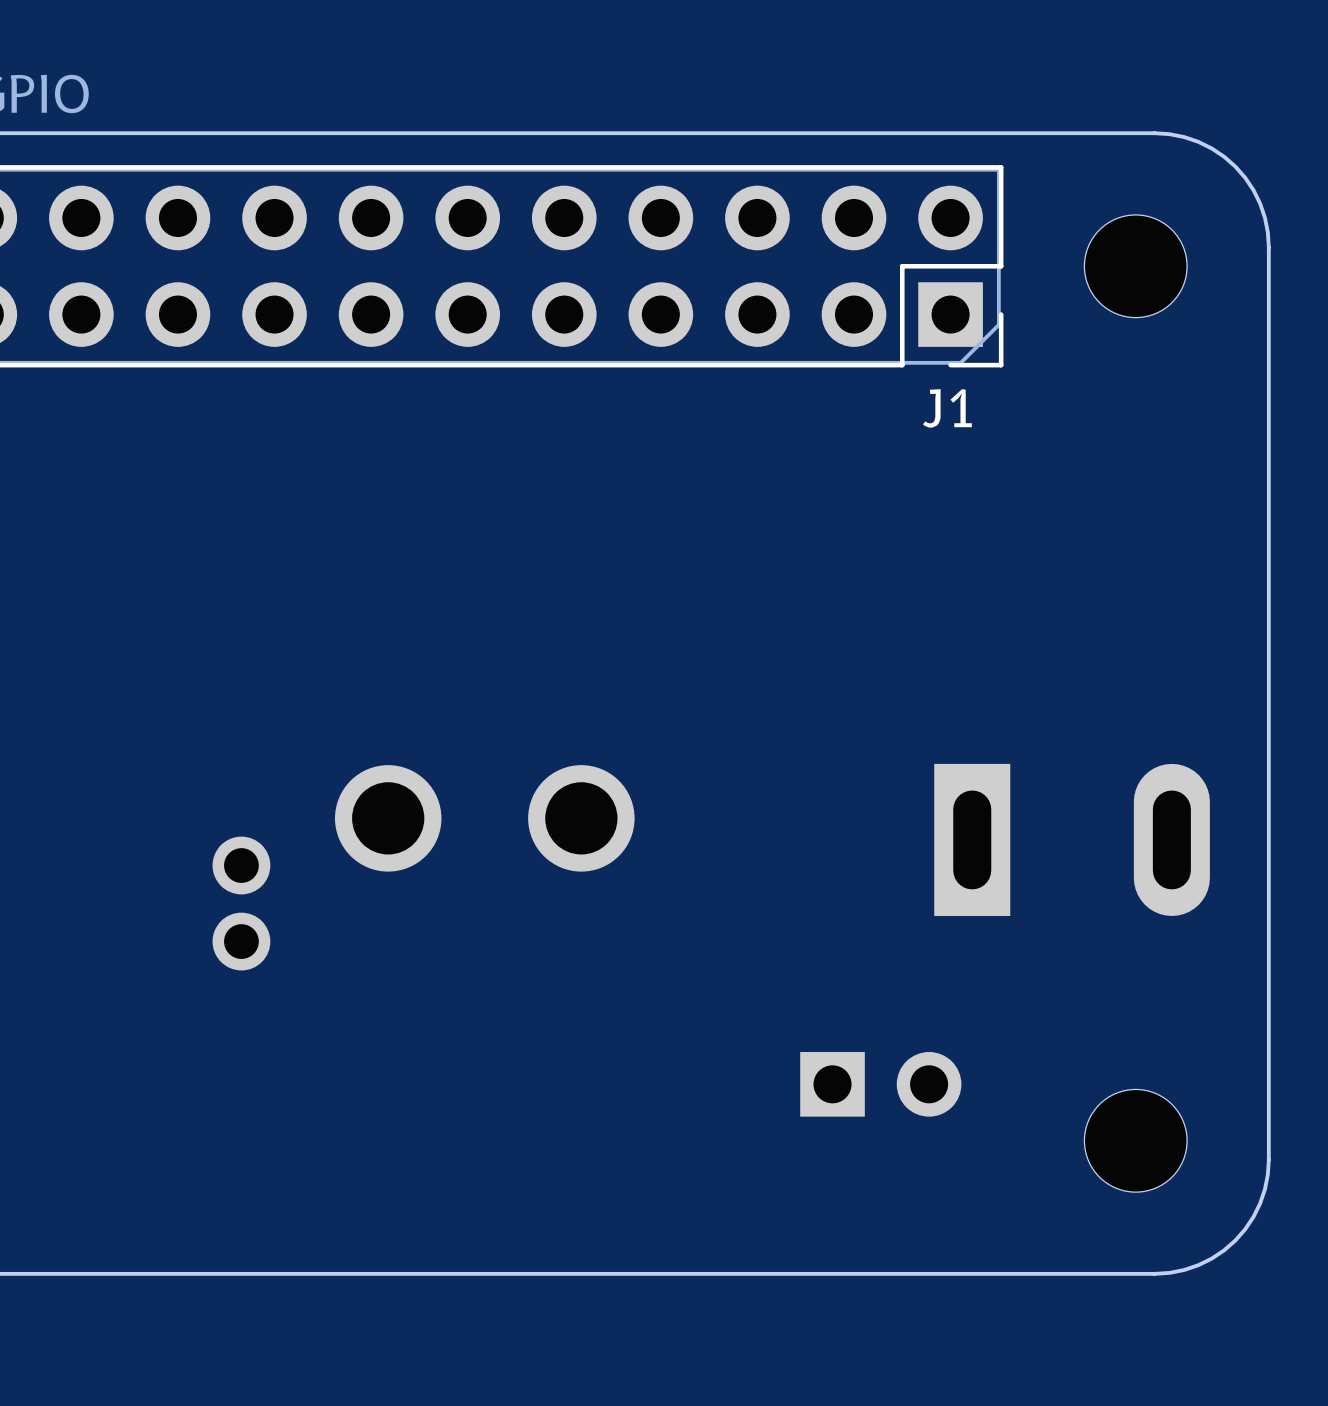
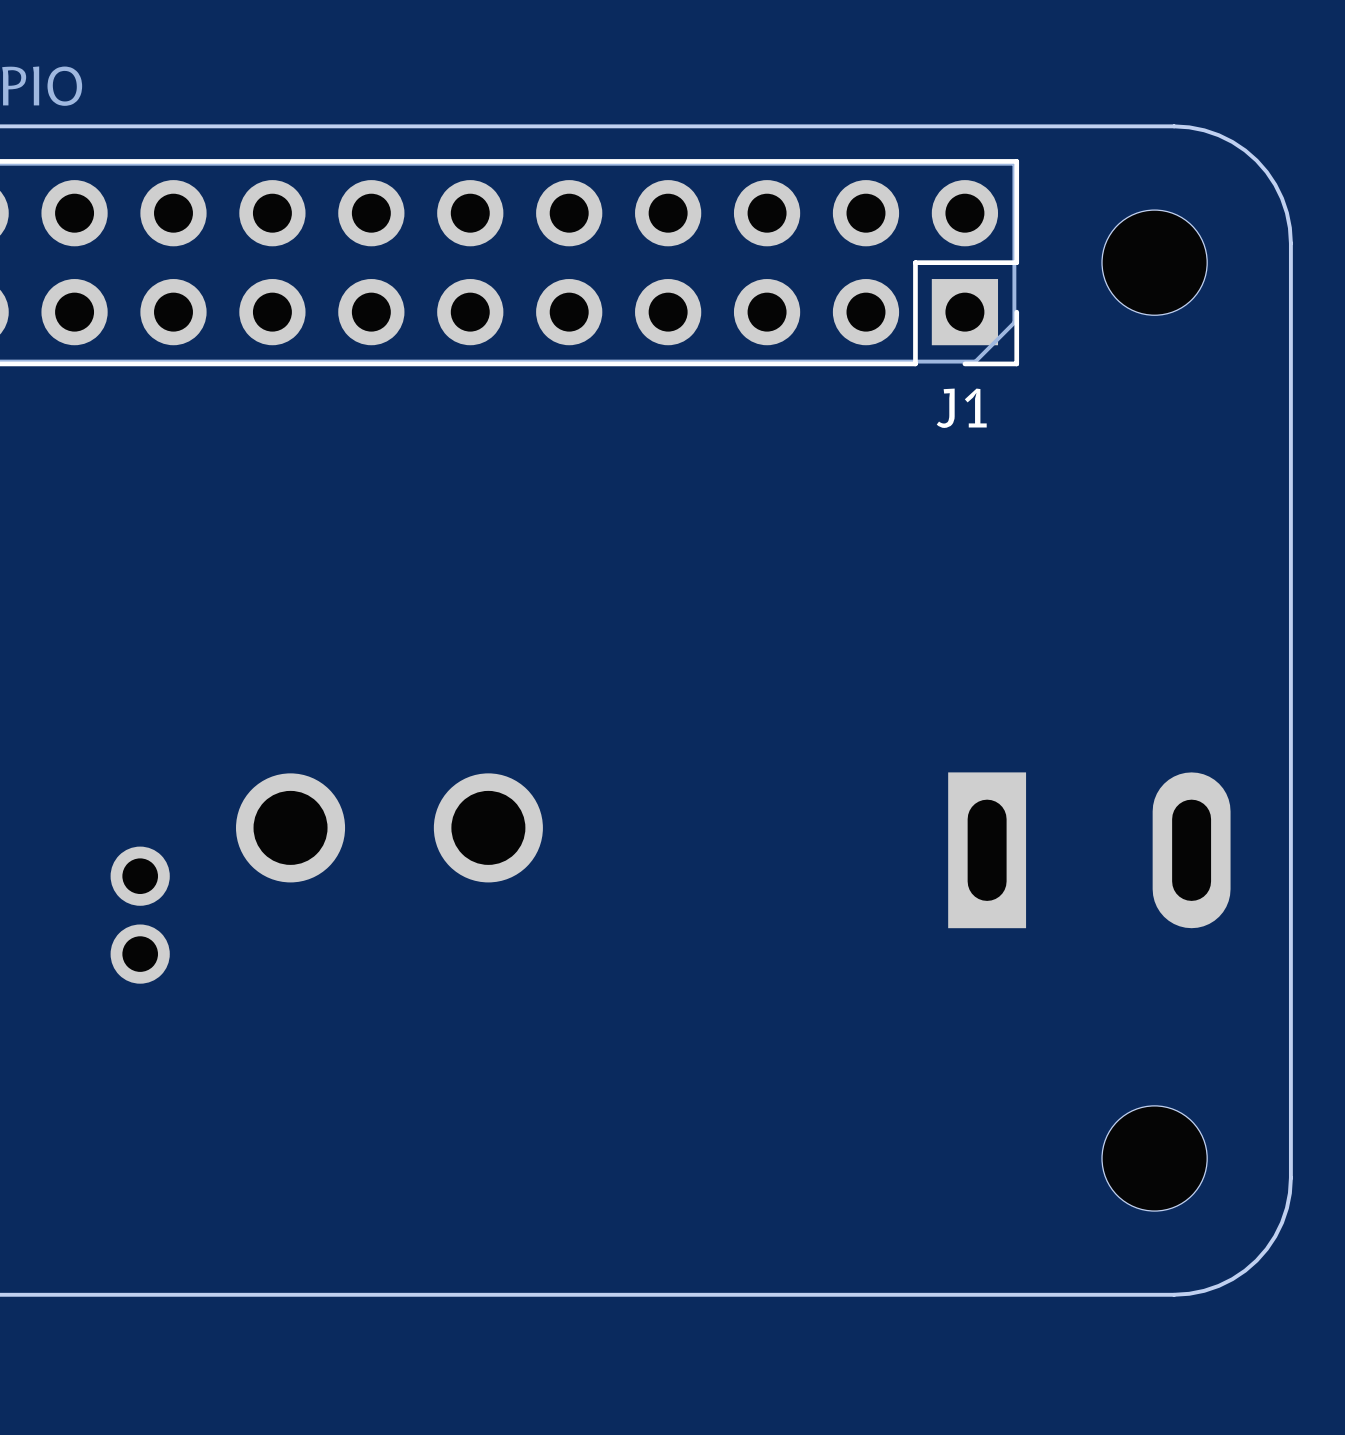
part position: (423, 867) -> (326, 878)
part: (880, 1084) -> none

